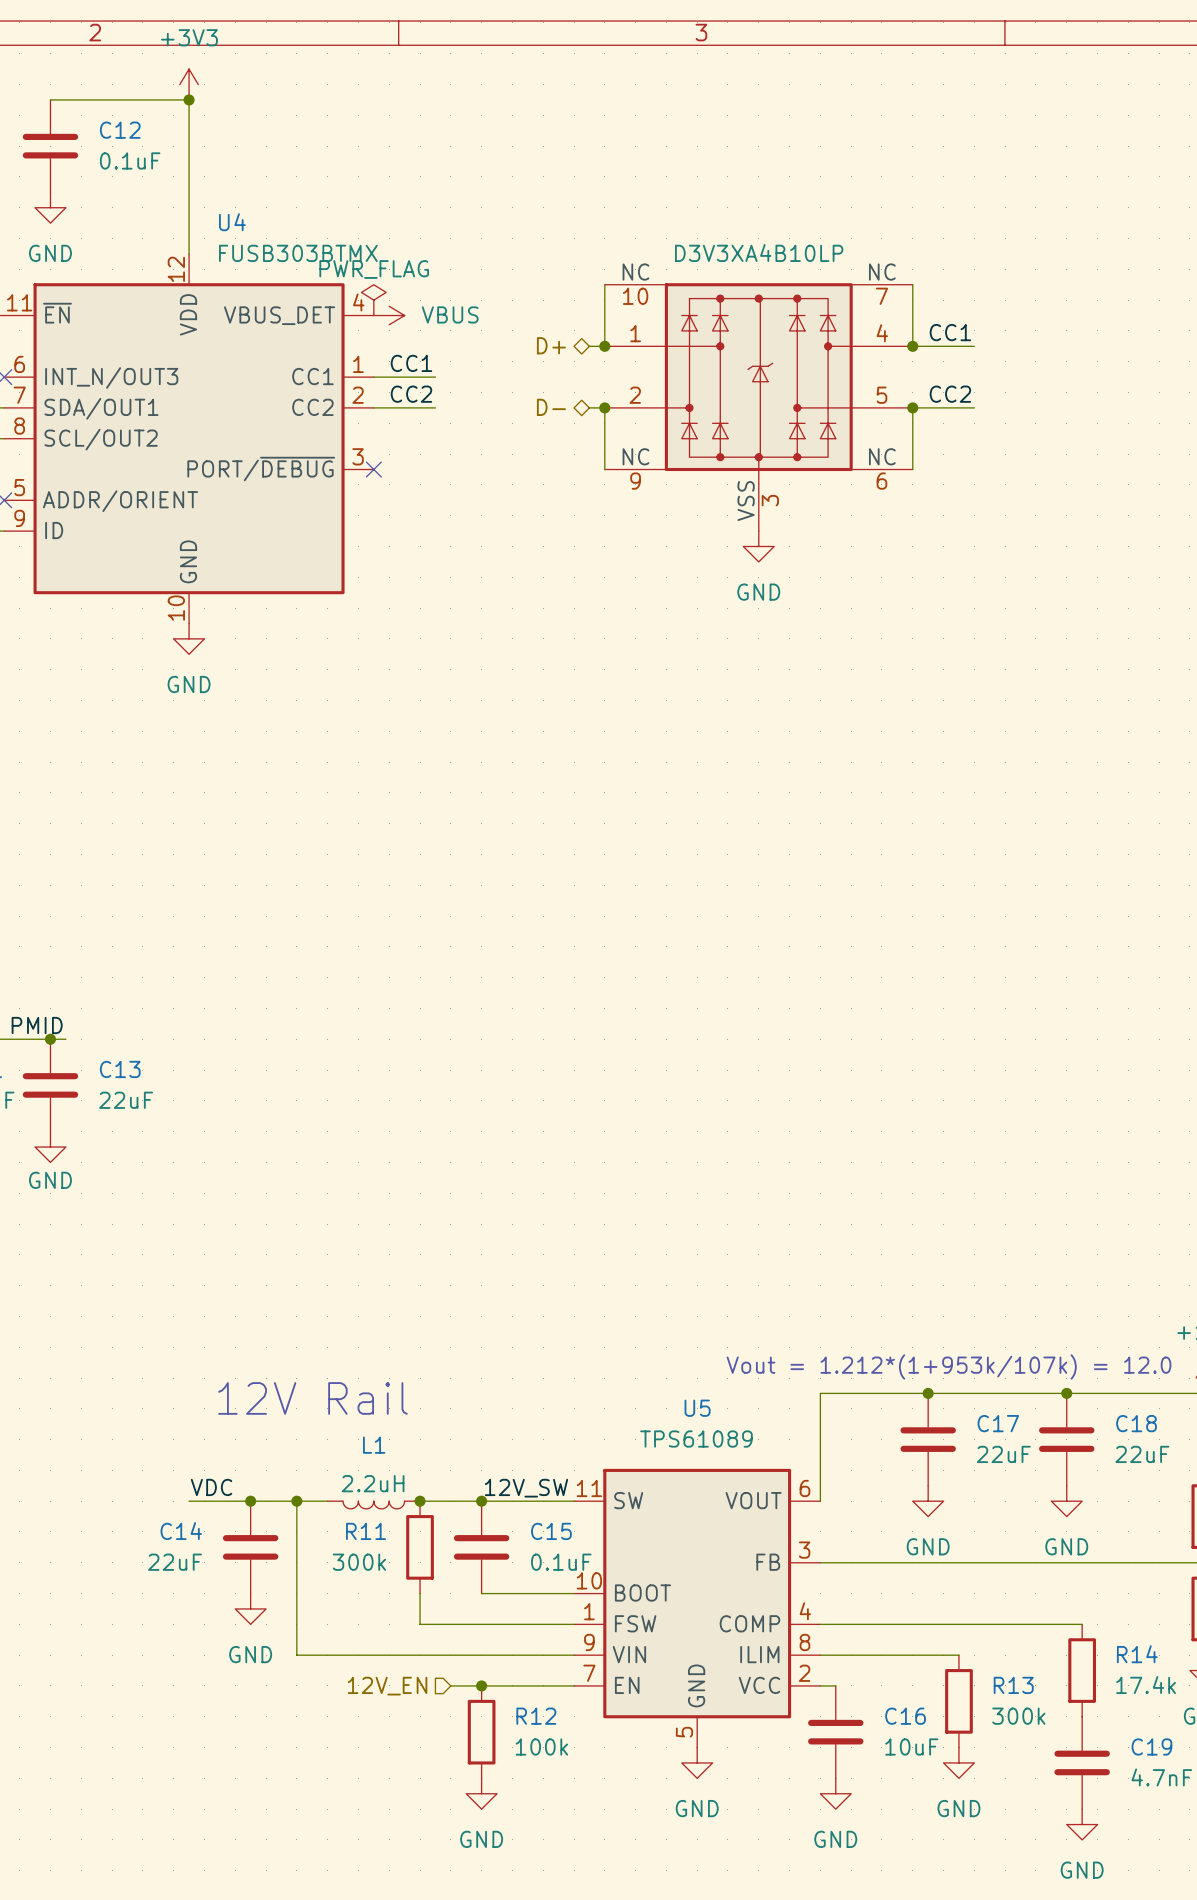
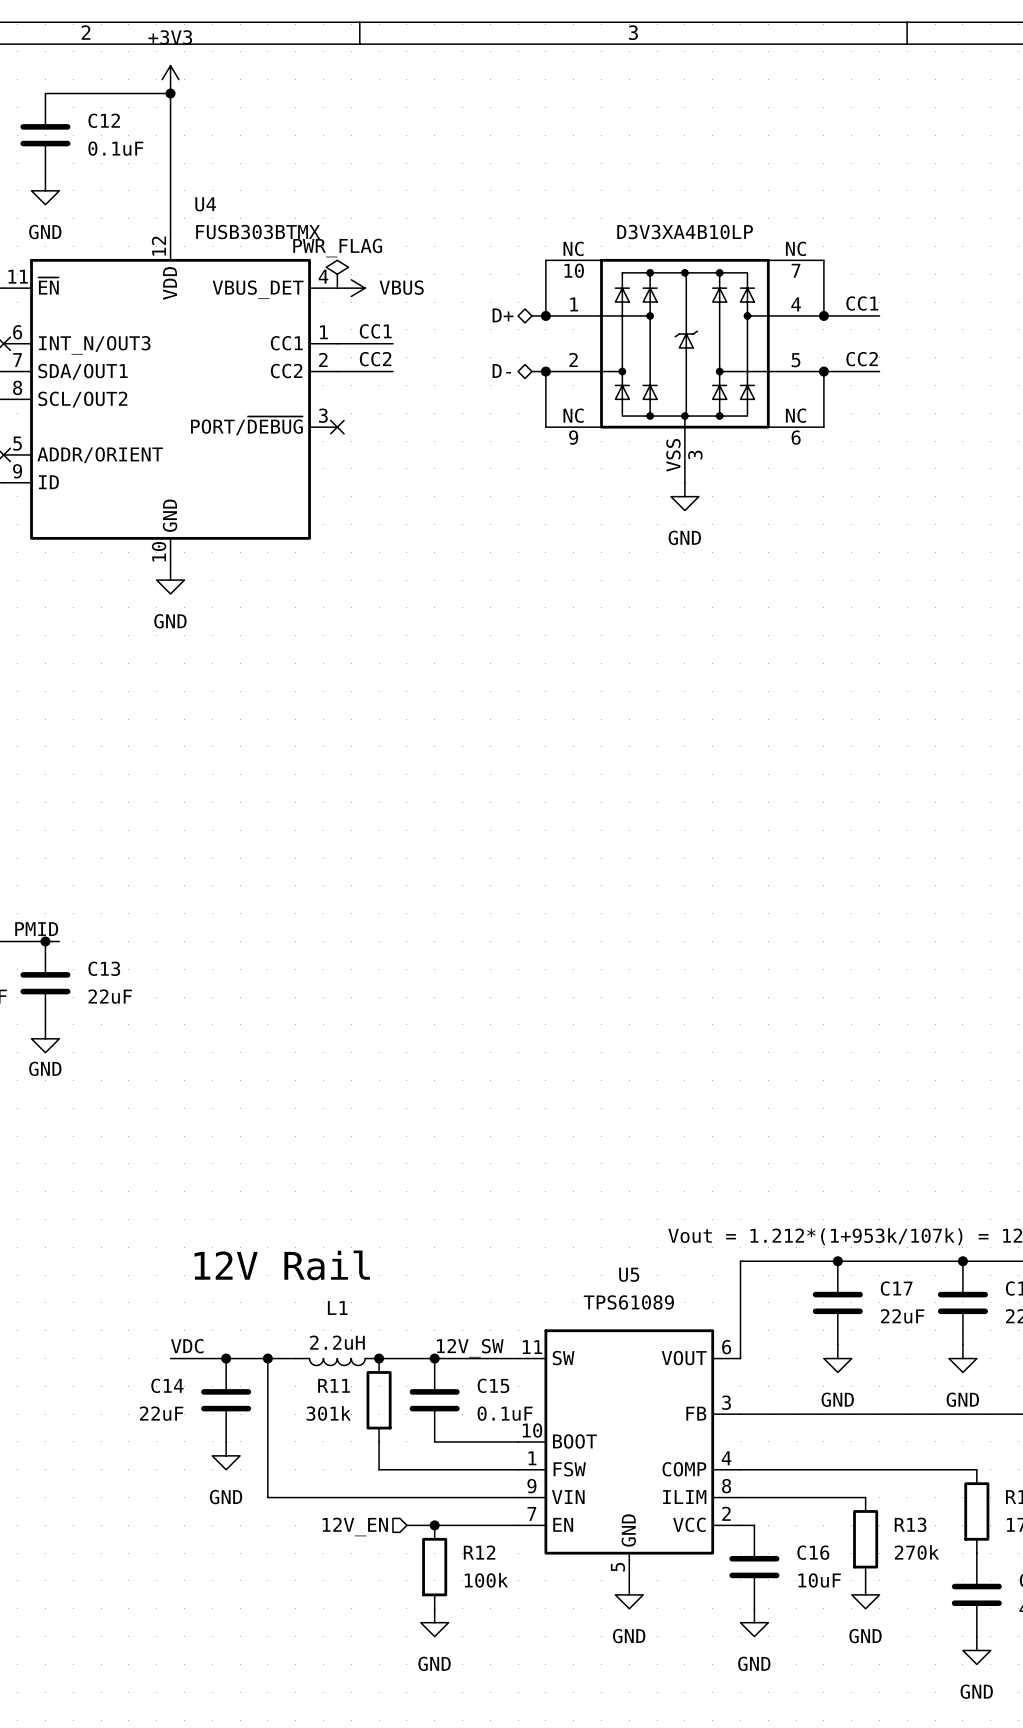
R11 value: 300k (359, 1562) -> 301k (328, 1413)
R13 value: 300k (1018, 1716) -> 270k (916, 1552)

